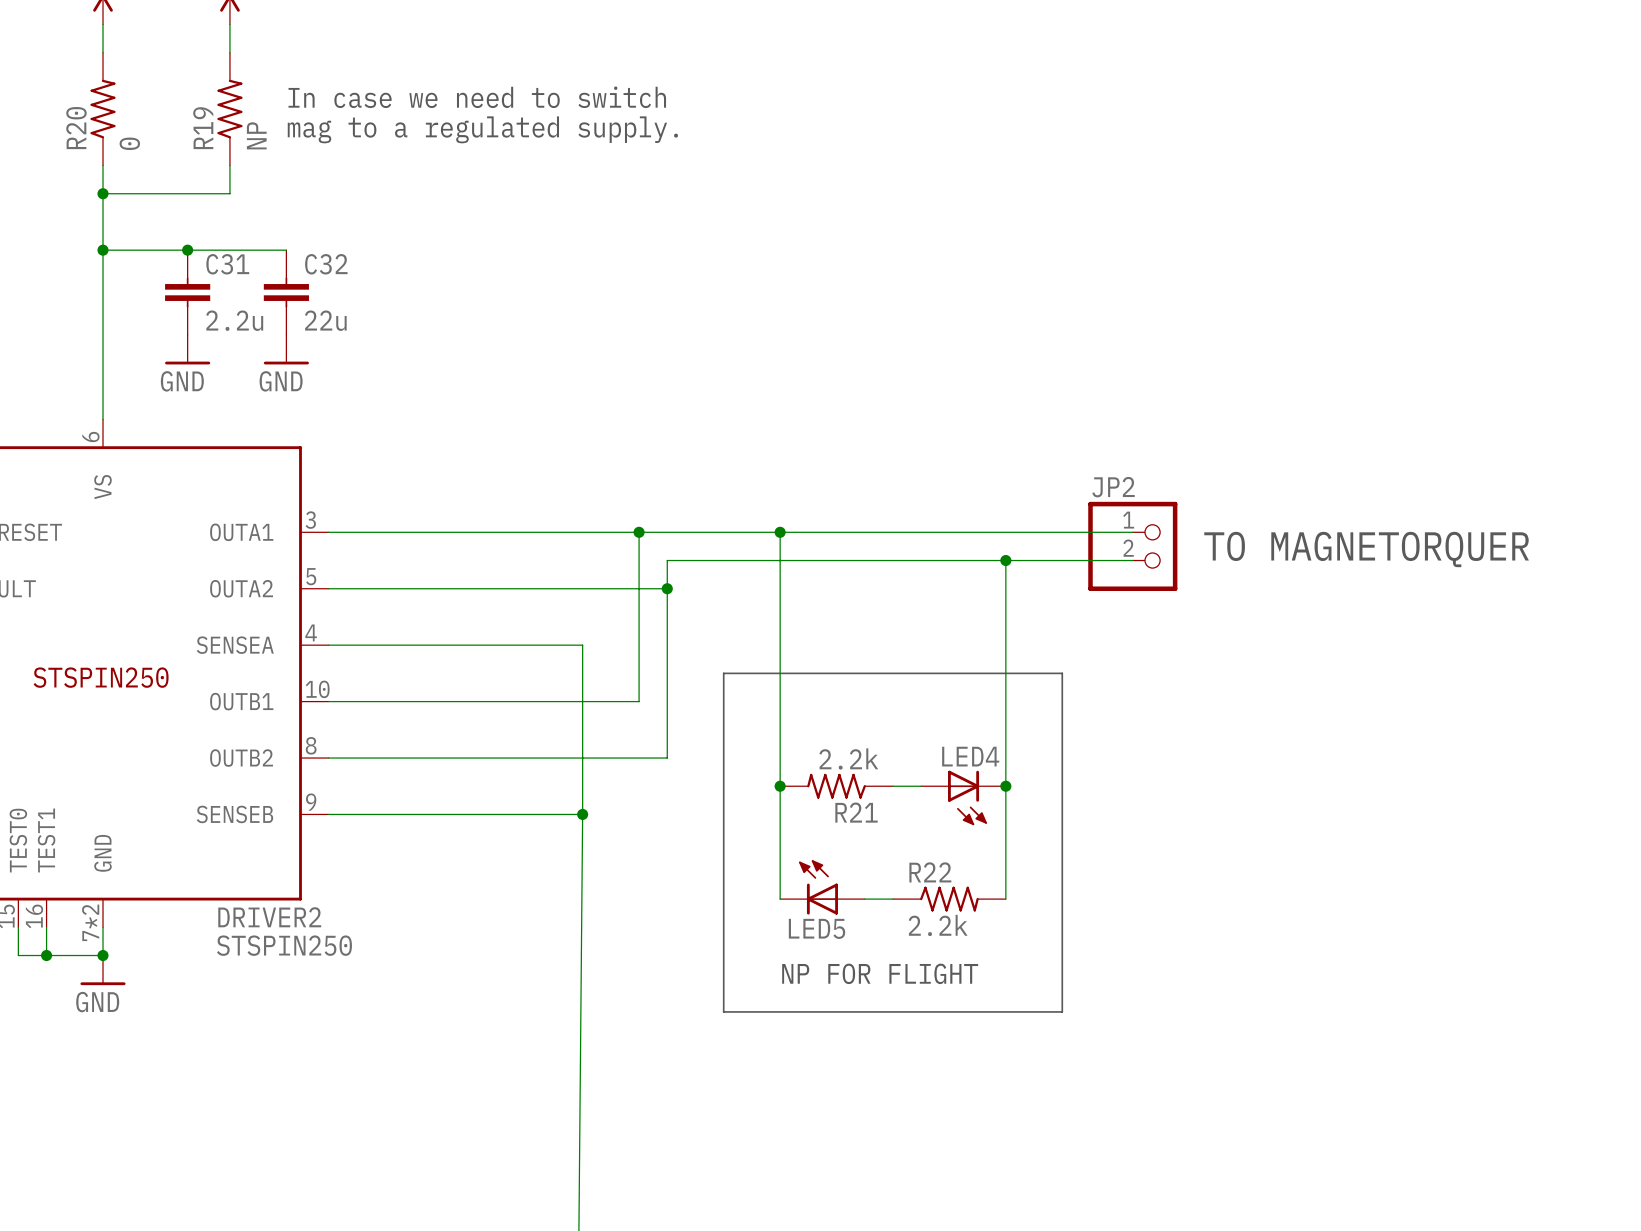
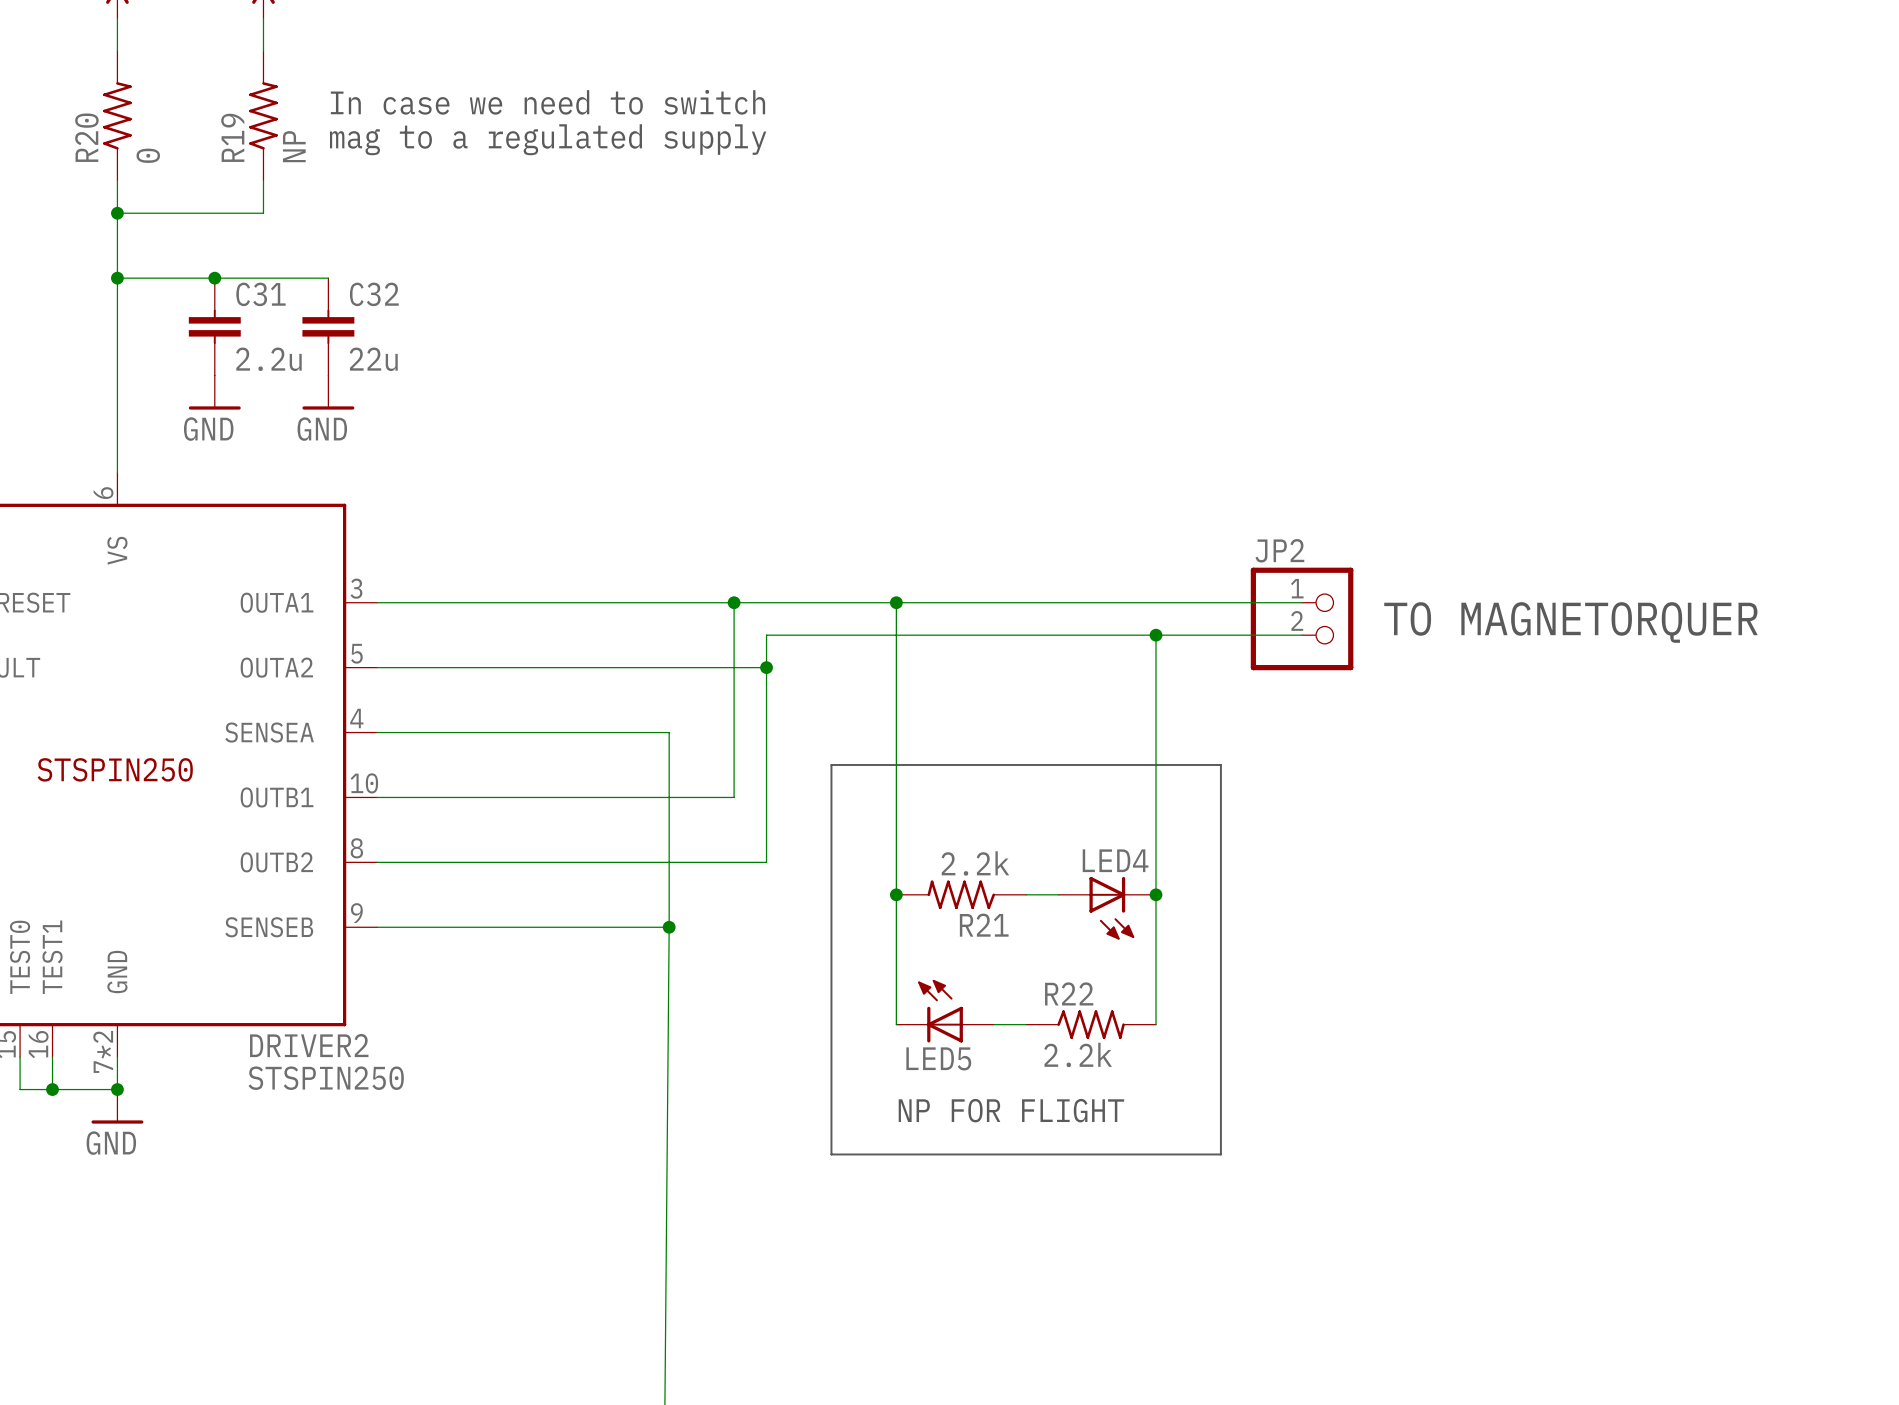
text: mag to a regulated supply. (482, 129) -> mag to a regulated supply (548, 139)

